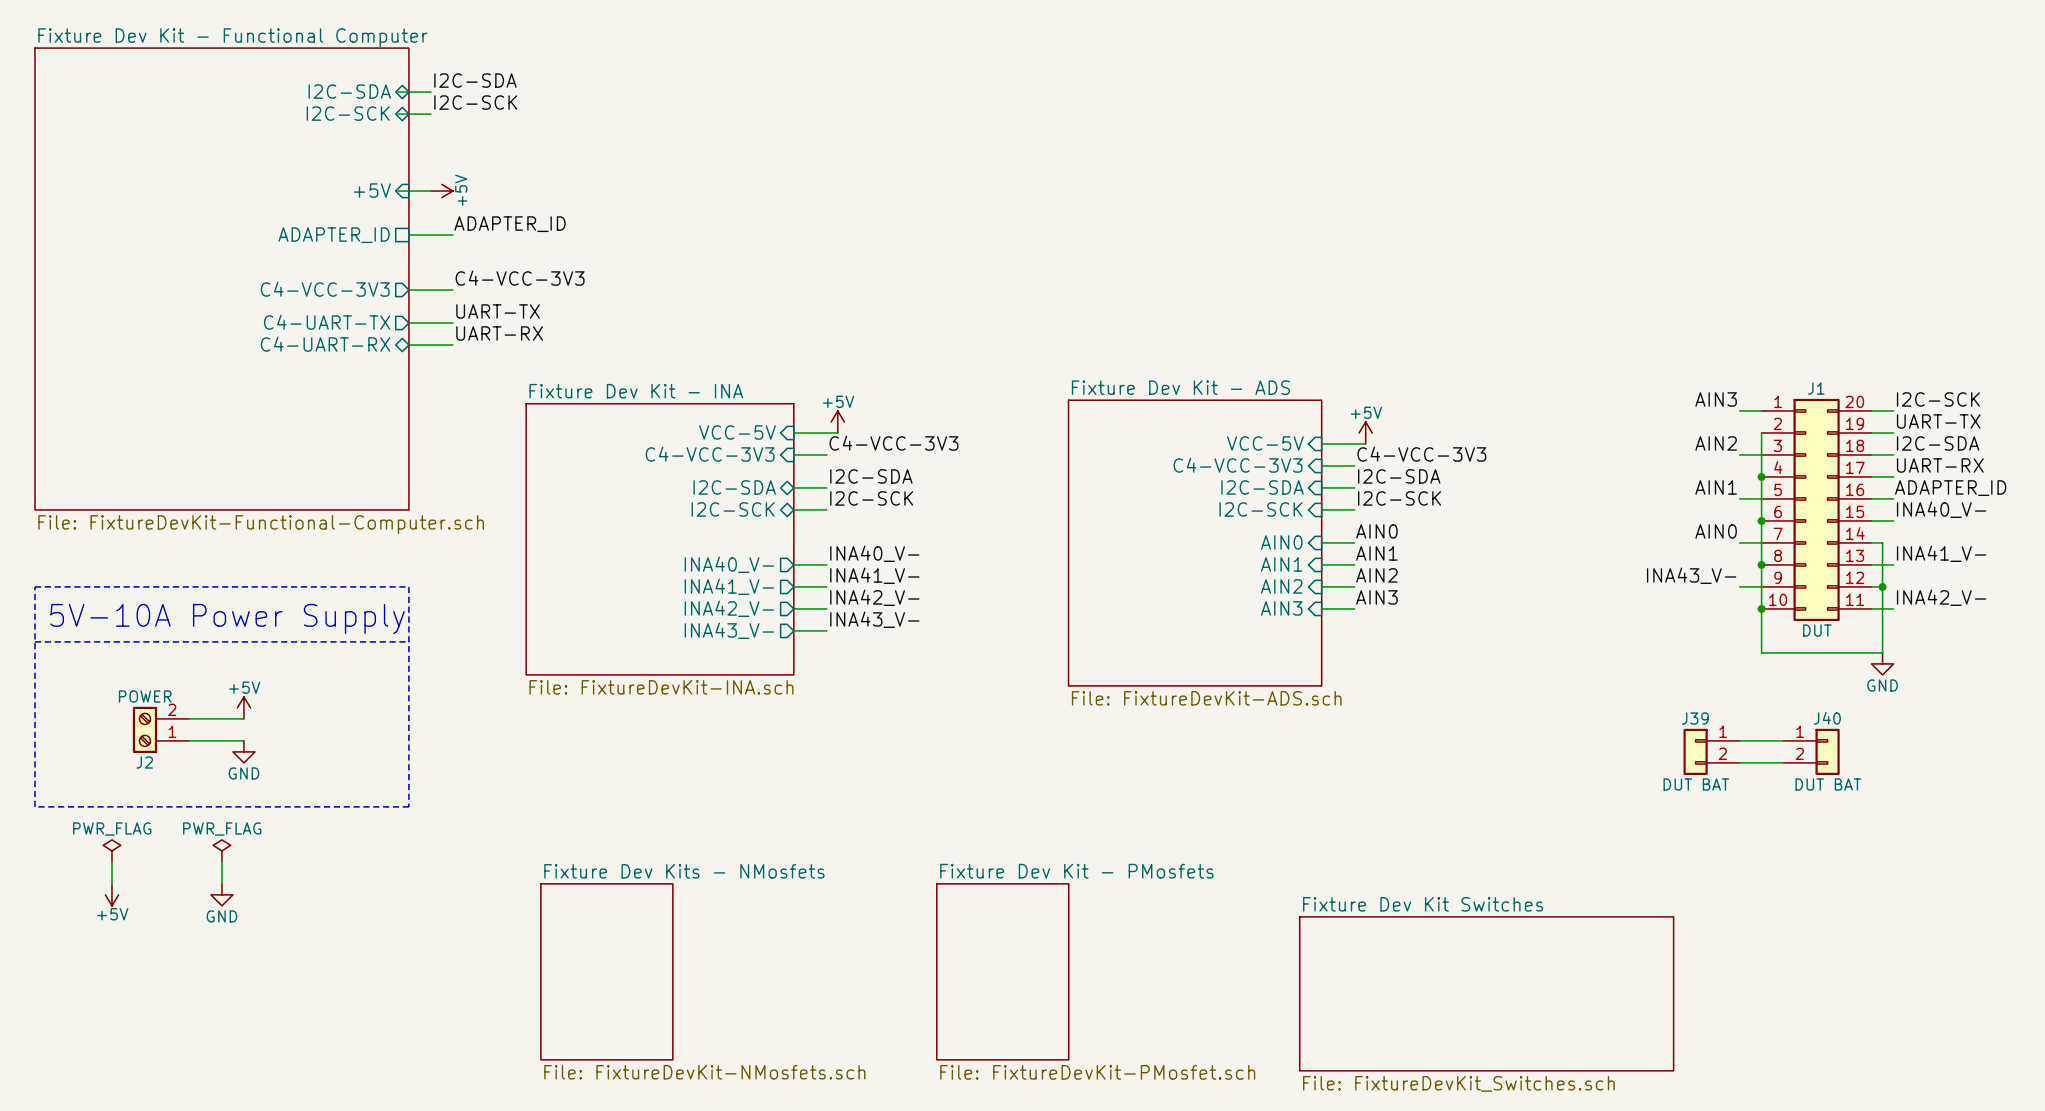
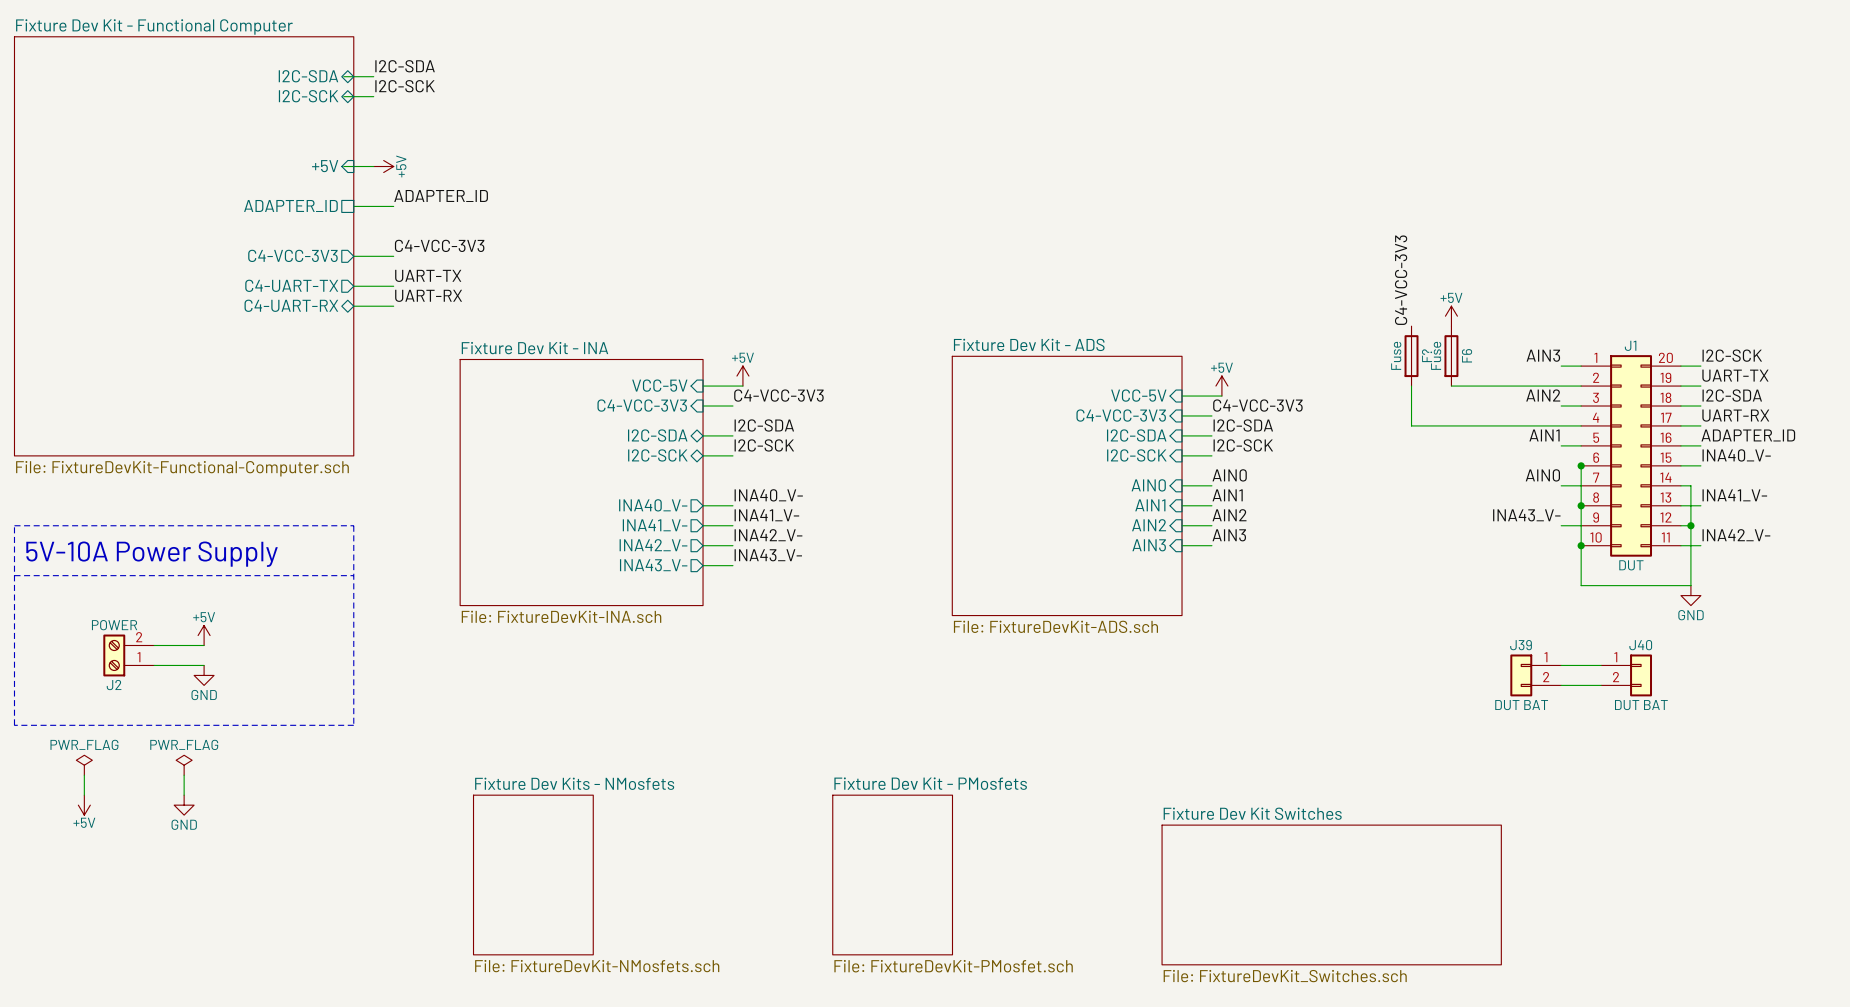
label: none -> C4-VCC-3V3 (1401, 280)
power symbol: none -> +5V (1451, 316)
F?: none -> Fuse (1411, 356)
F6: none -> Fuse (1451, 356)
wire: none -> (1411, 386) (1411, 425) (1581, 425)
wire: (1761, 432) (1761, 520) -> (1581, 386) (1451, 386)
junction: (1761, 476) -> none

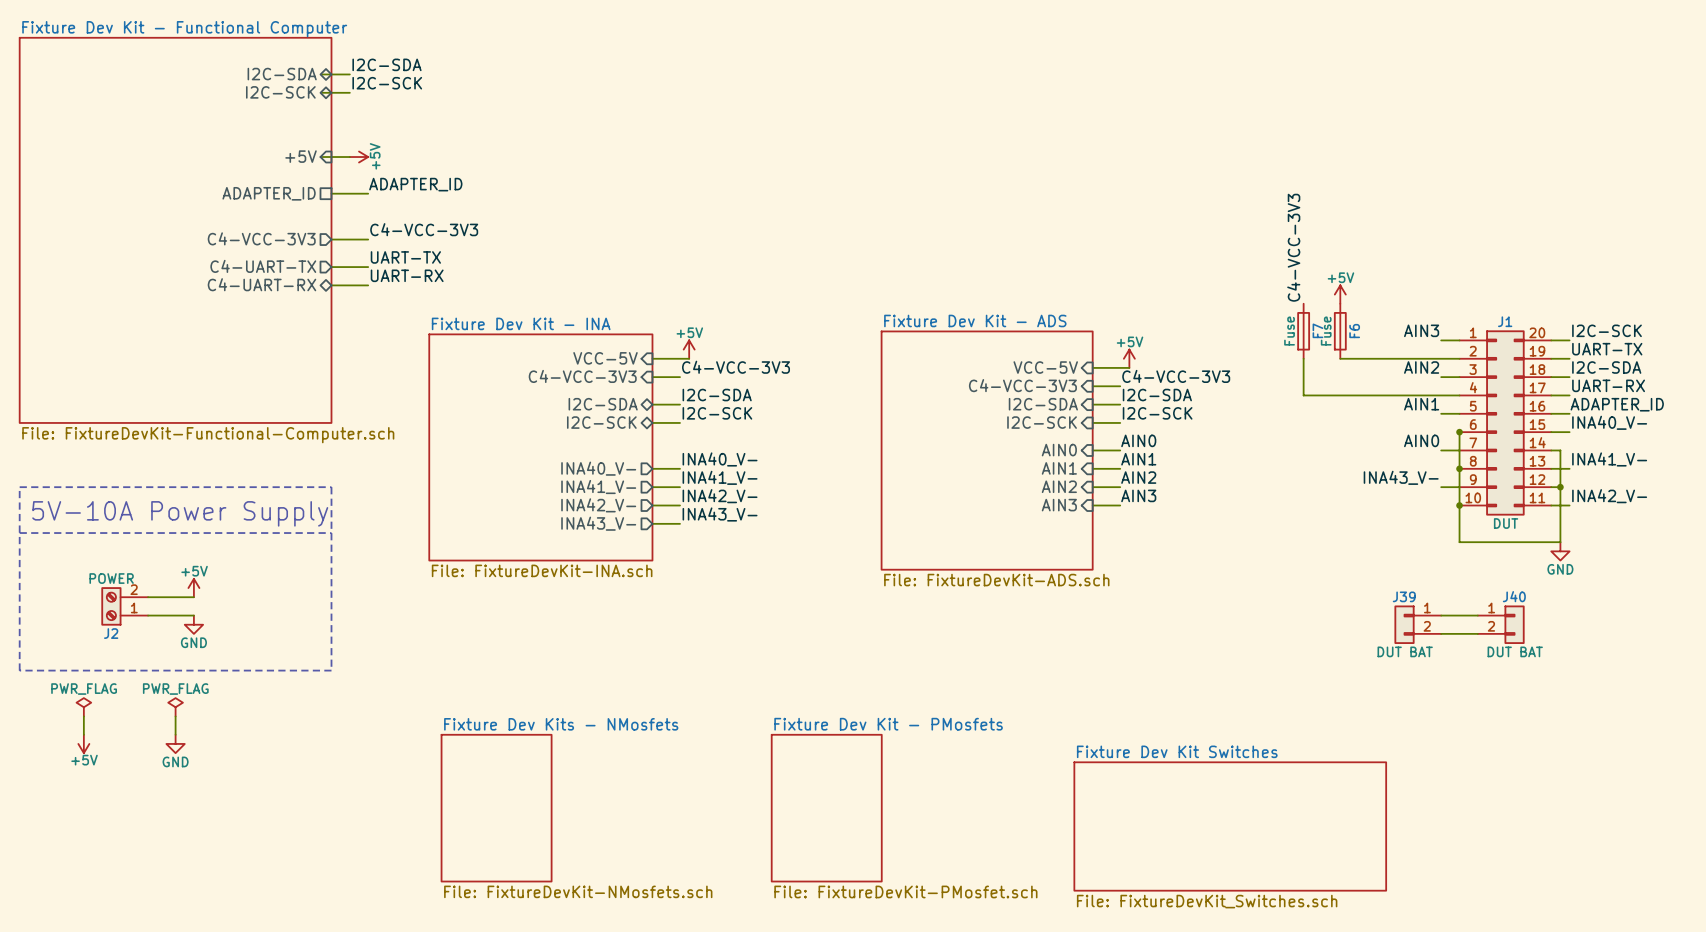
F? name: F? (1427, 355) -> F7 (1317, 330)

